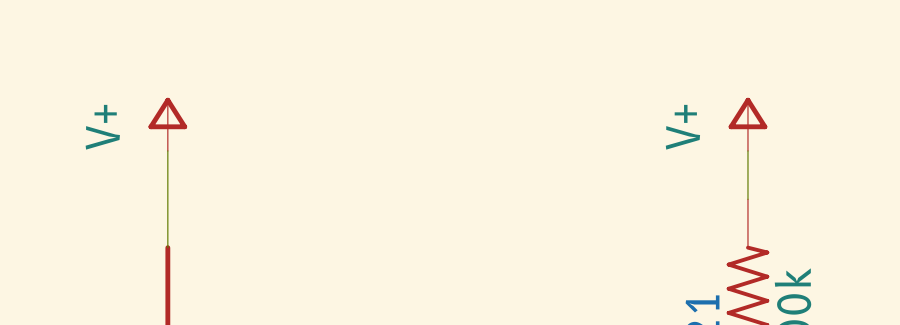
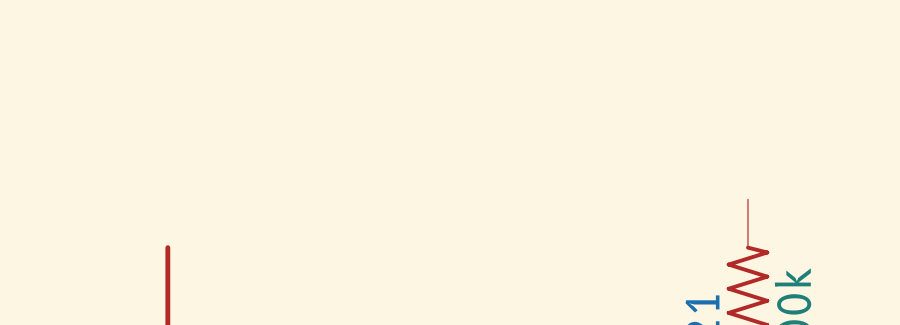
power symbol: V+ (167, 124) -> none
power symbol: V+ (747, 124) -> none
wire: (167, 150) (167, 247) -> none
wire: (747, 150) (747, 199) -> none

